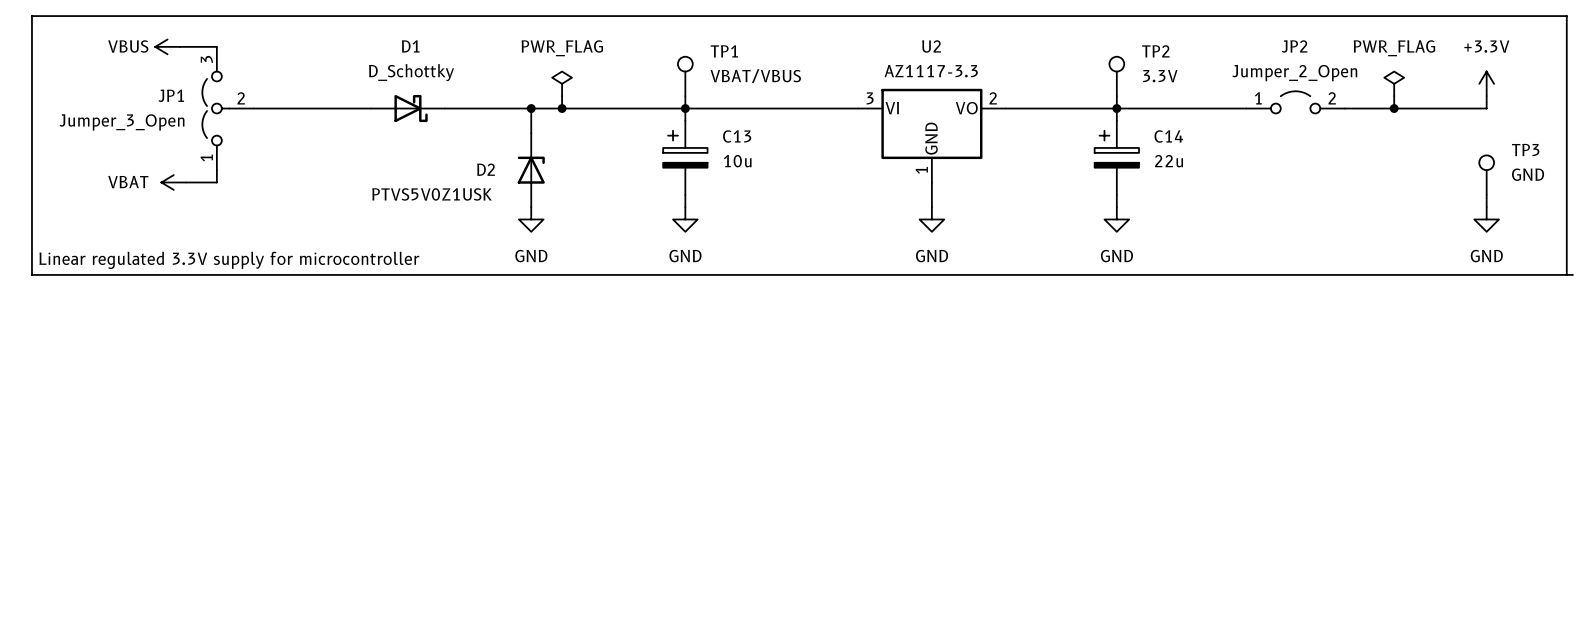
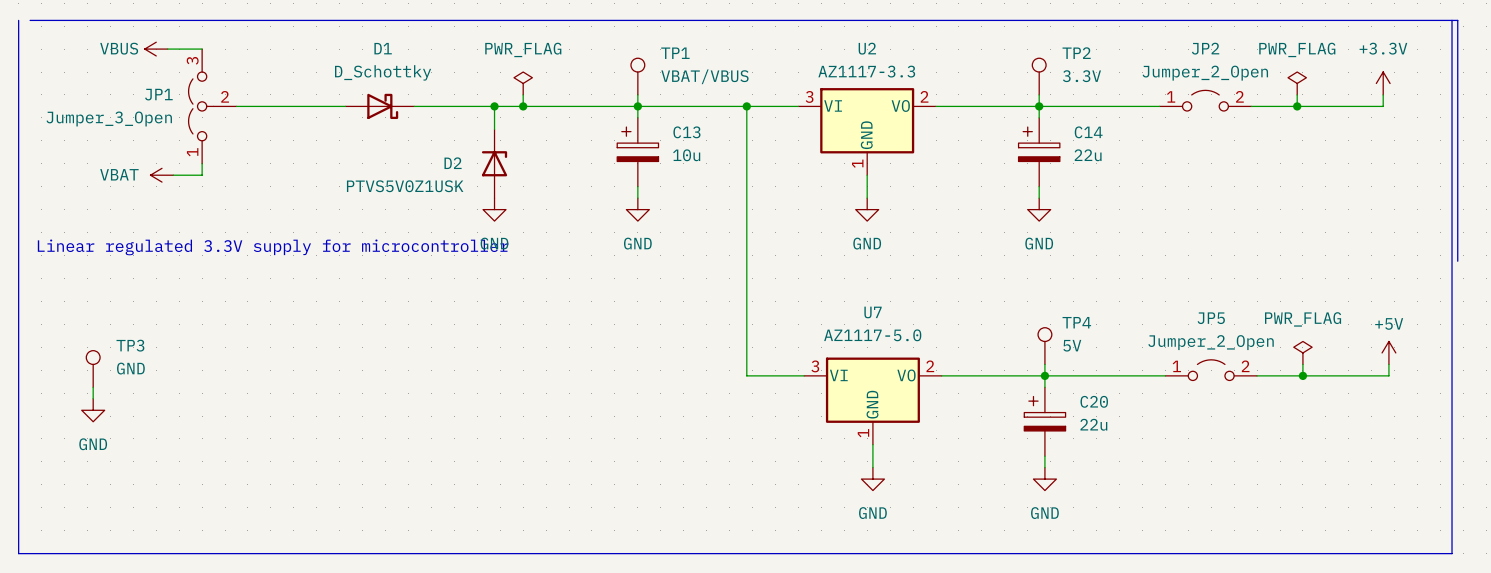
line: none -> (18, 20) (18, 553) (1452, 553) (1452, 20)
line: (31, 16) (31, 274) (1572, 274) -> none
wire: none -> (746, 106) (746, 375) (804, 375)
junction: none -> (746, 106)
TP3 position: (1486, 175) -> (93, 369)
wire: (1486, 194) (1486, 207) -> (1302, 364) (1302, 375)
power symbol: GND (1486, 219) -> none
TP4: none -> 5V (1044, 346)
power symbol: none -> PWR_FLAG (1302, 352)
power symbol: none -> +5V (1388, 352)
wire: none -> (1044, 364) (1044, 387)
wire: none -> (1388, 364) (1388, 375) (1257, 375)
JP5: none -> Jumper_2_Open (1211, 370)
wire: none -> (941, 375) (1165, 375)
junction: none -> (1044, 375)
junction: none -> (1302, 375)
wire: none -> (93, 387) (93, 398)
U7: none -> AZ1117-5.0 (872, 401)
power symbol: none -> GND (93, 410)
C20: none -> 22u (1044, 421)
wire: none -> (872, 444) (872, 467)
wire: none -> (1044, 456) (1044, 467)
power symbol: none -> GND (872, 479)
power symbol: none -> GND (1044, 479)

